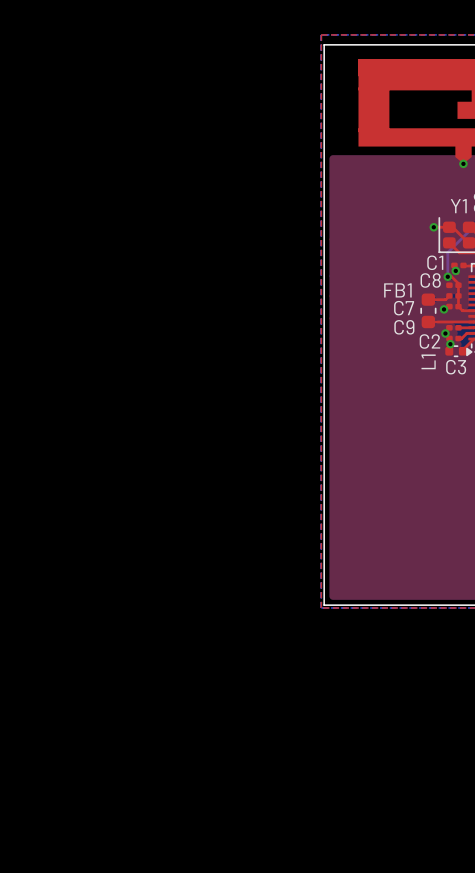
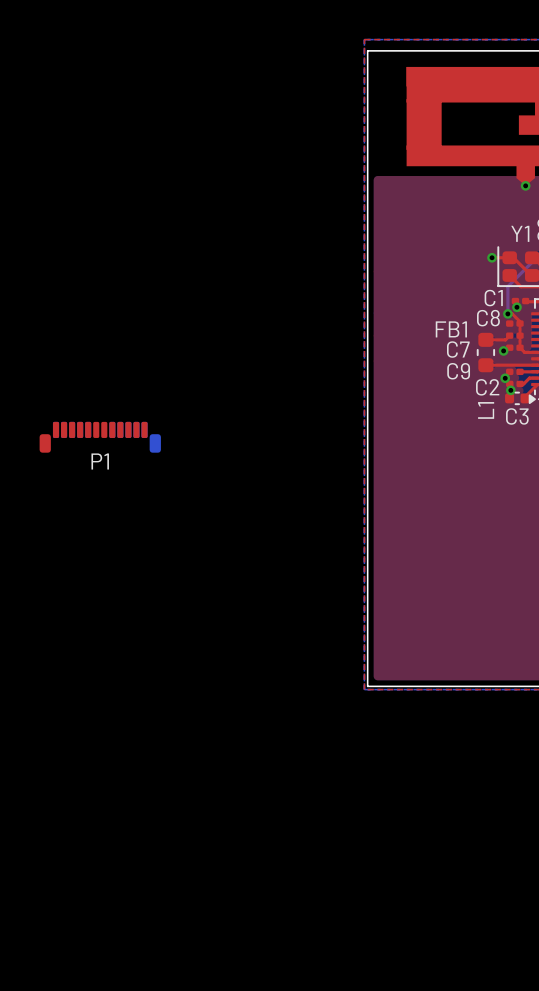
P1: none -> (100, 437)

